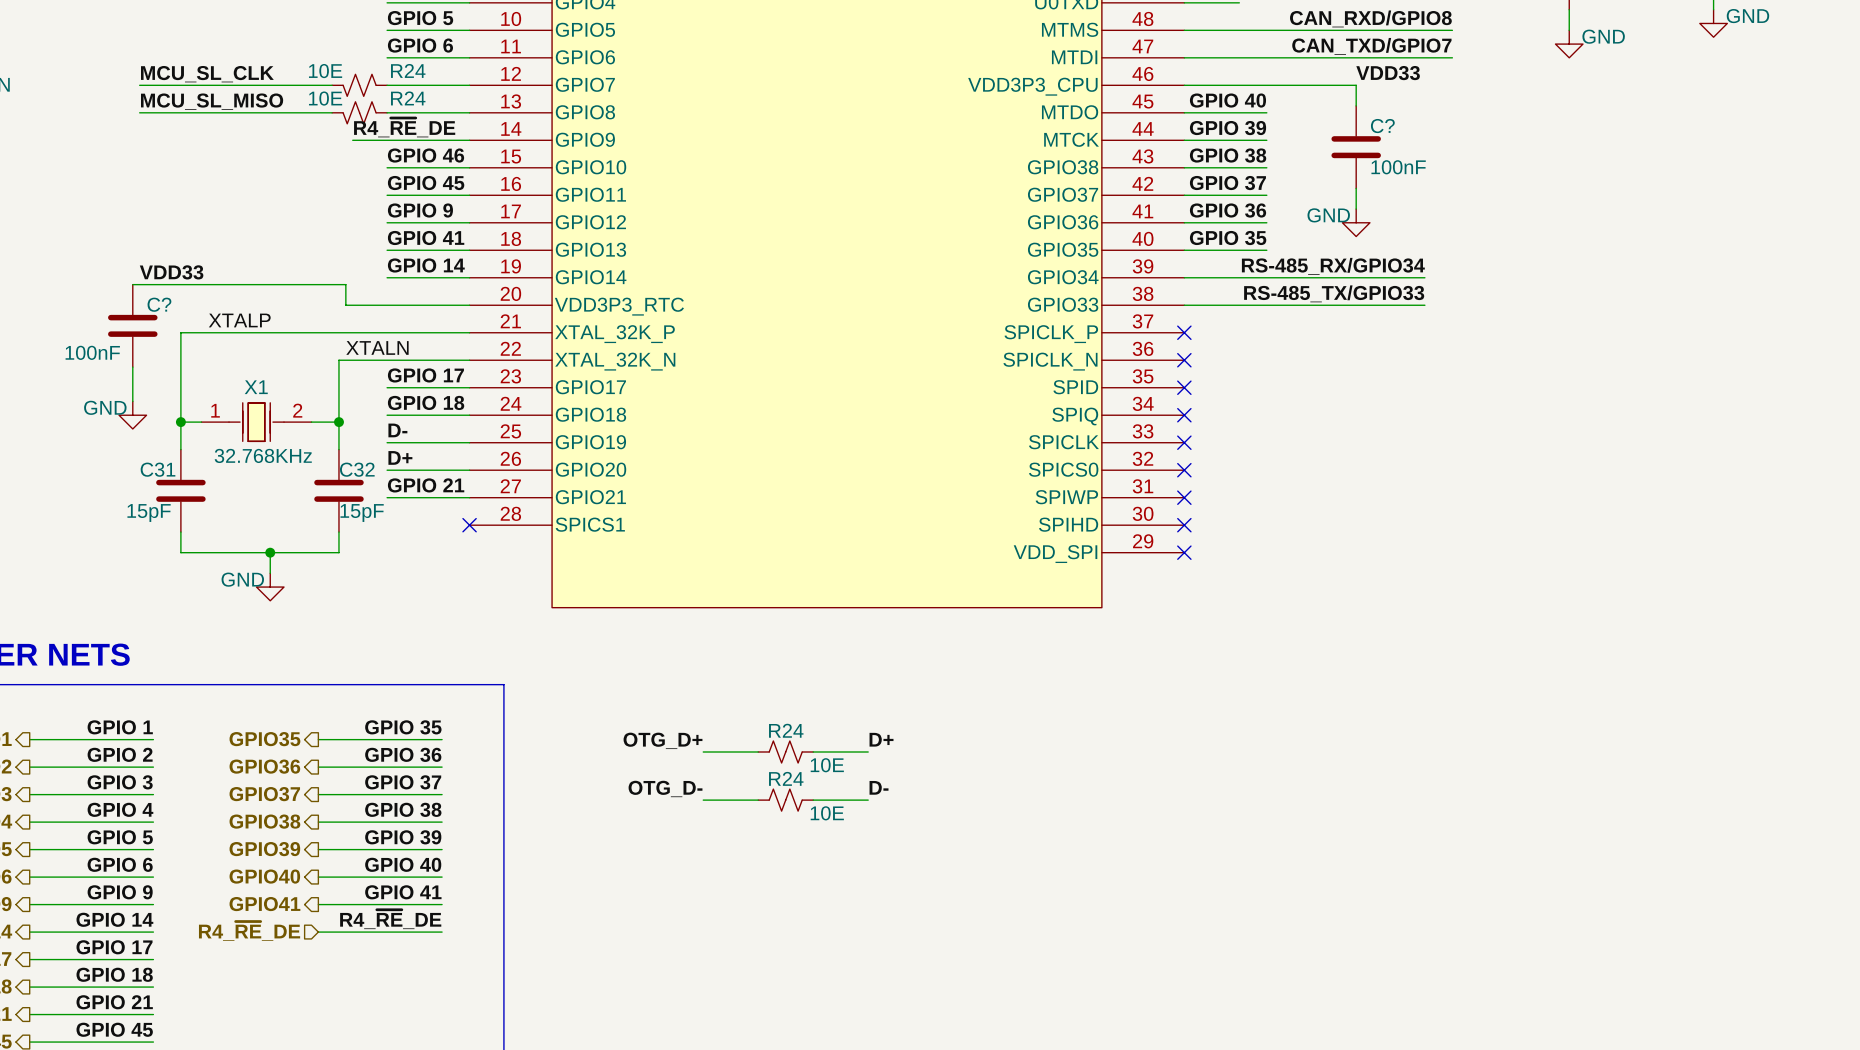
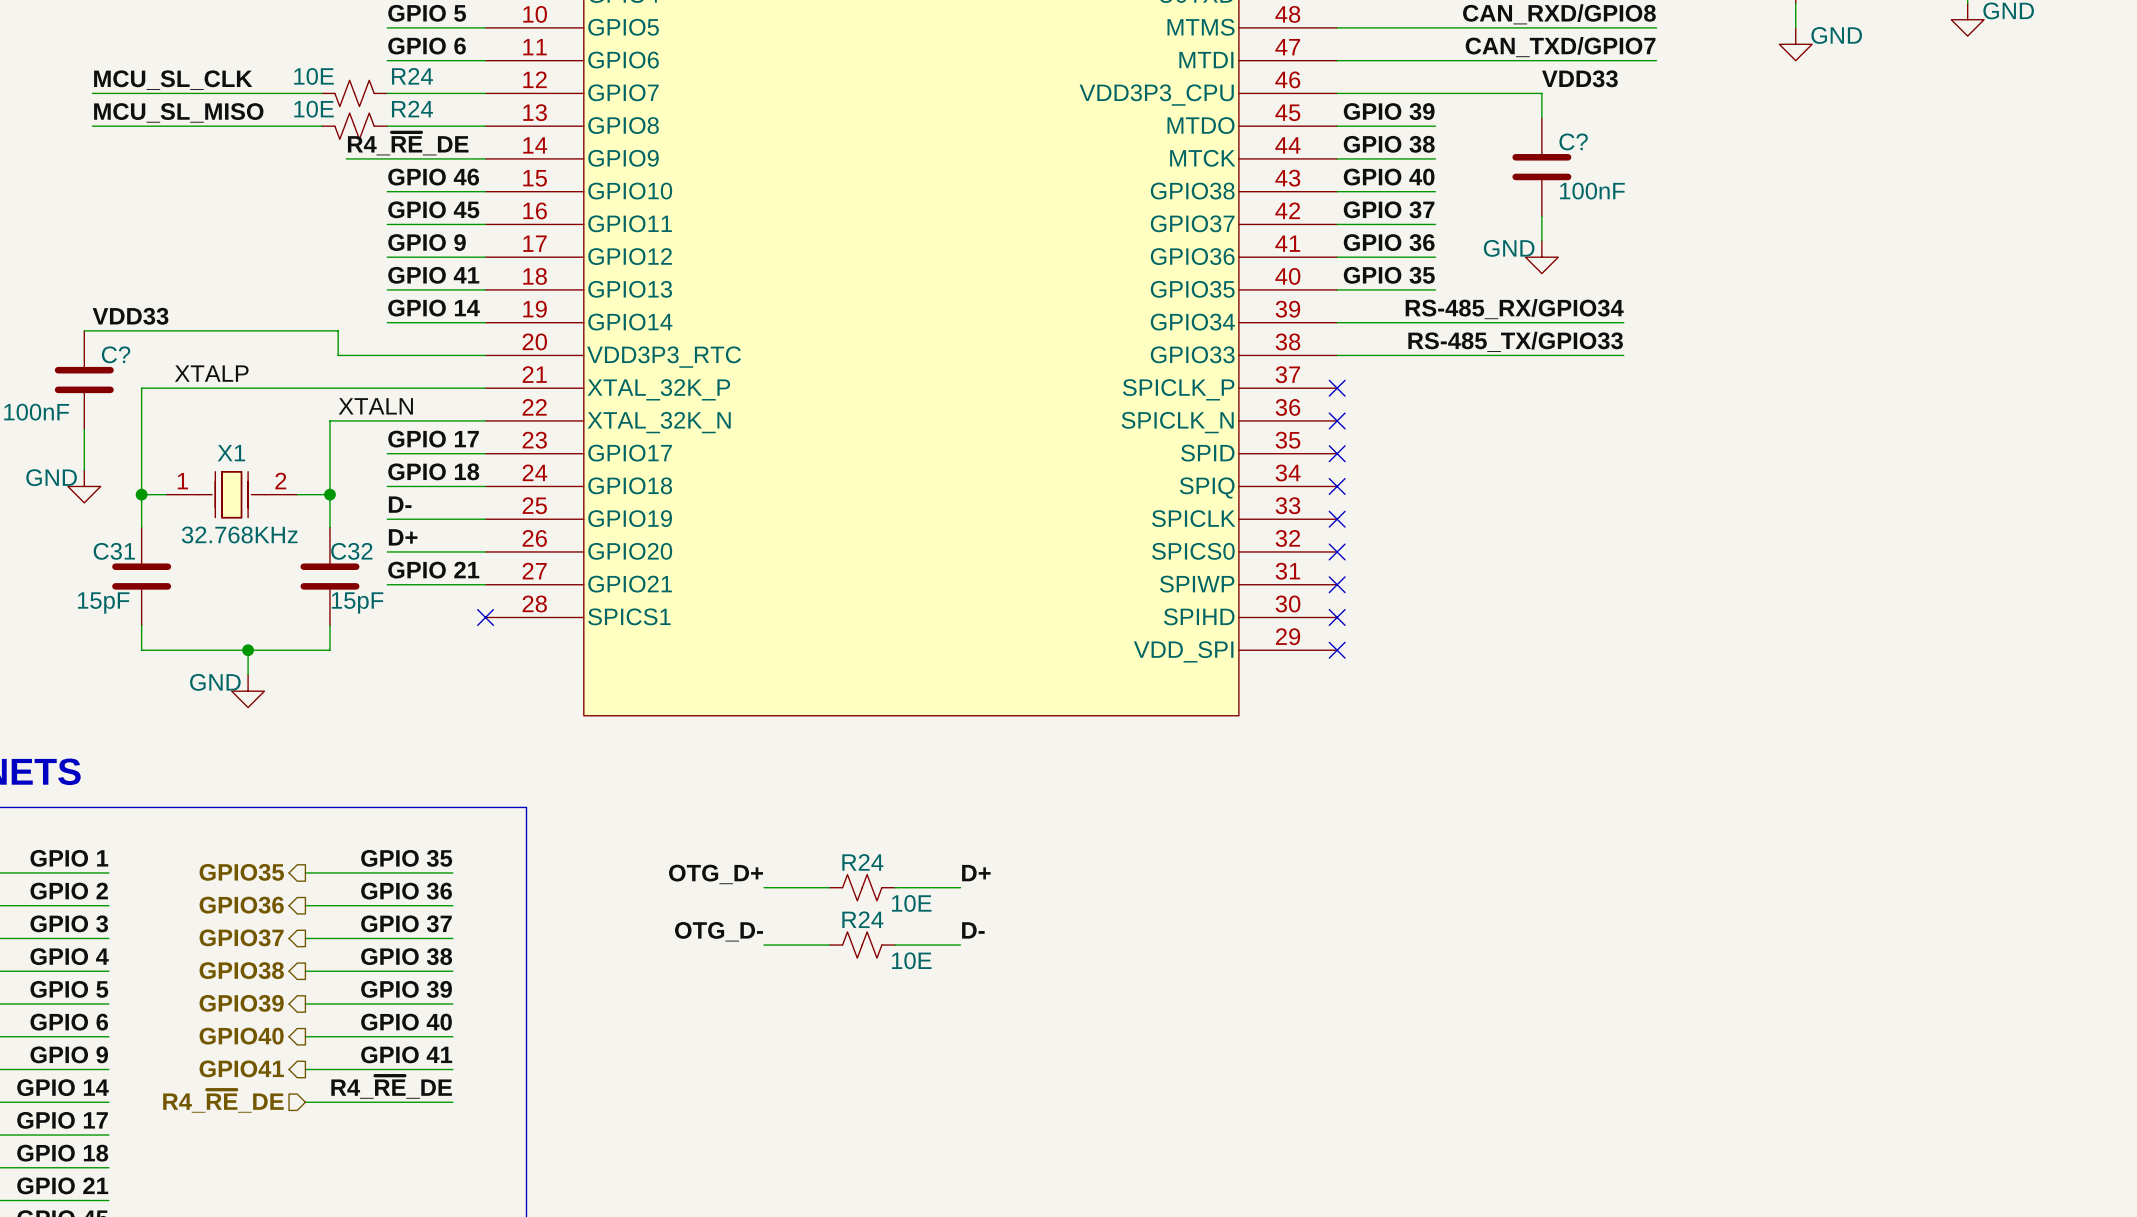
label: GPIO 40 (1227, 100) -> GPIO 39 (1389, 111)
label: GPIO 39 (1228, 128) -> GPIO 38 (1389, 144)
label: GPIO 38 (1228, 155) -> GPIO 40 (1389, 177)

